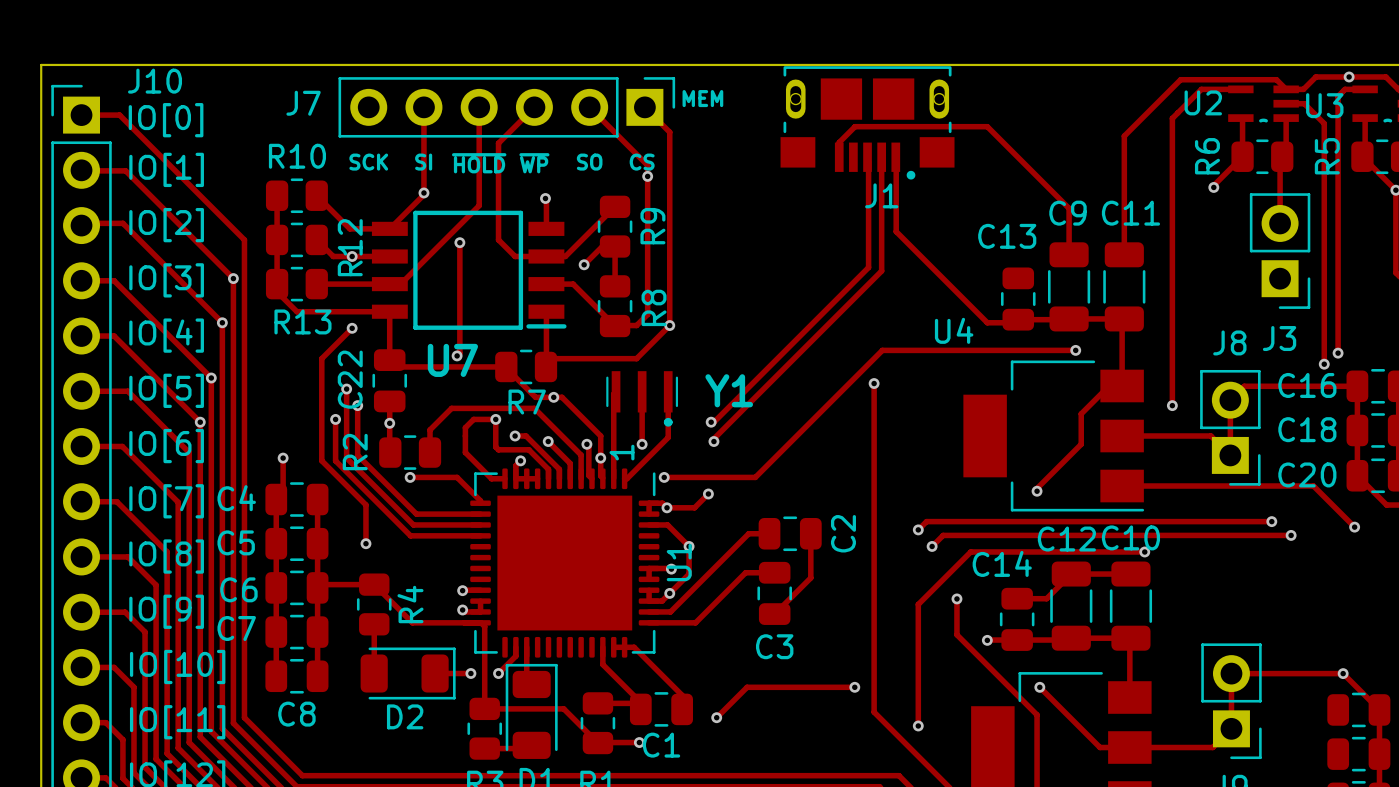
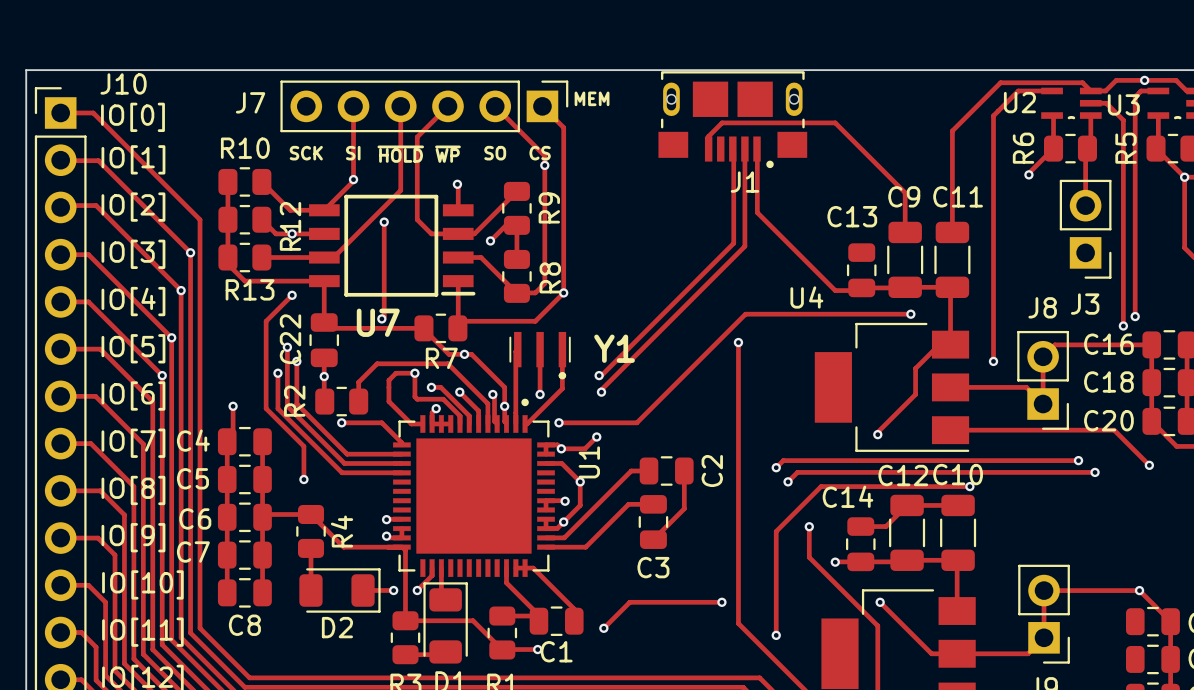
text: 1 (621, 452) -> none
U1 footprint: [470, 468, 660, 658] -> [392, 398, 555, 578]

